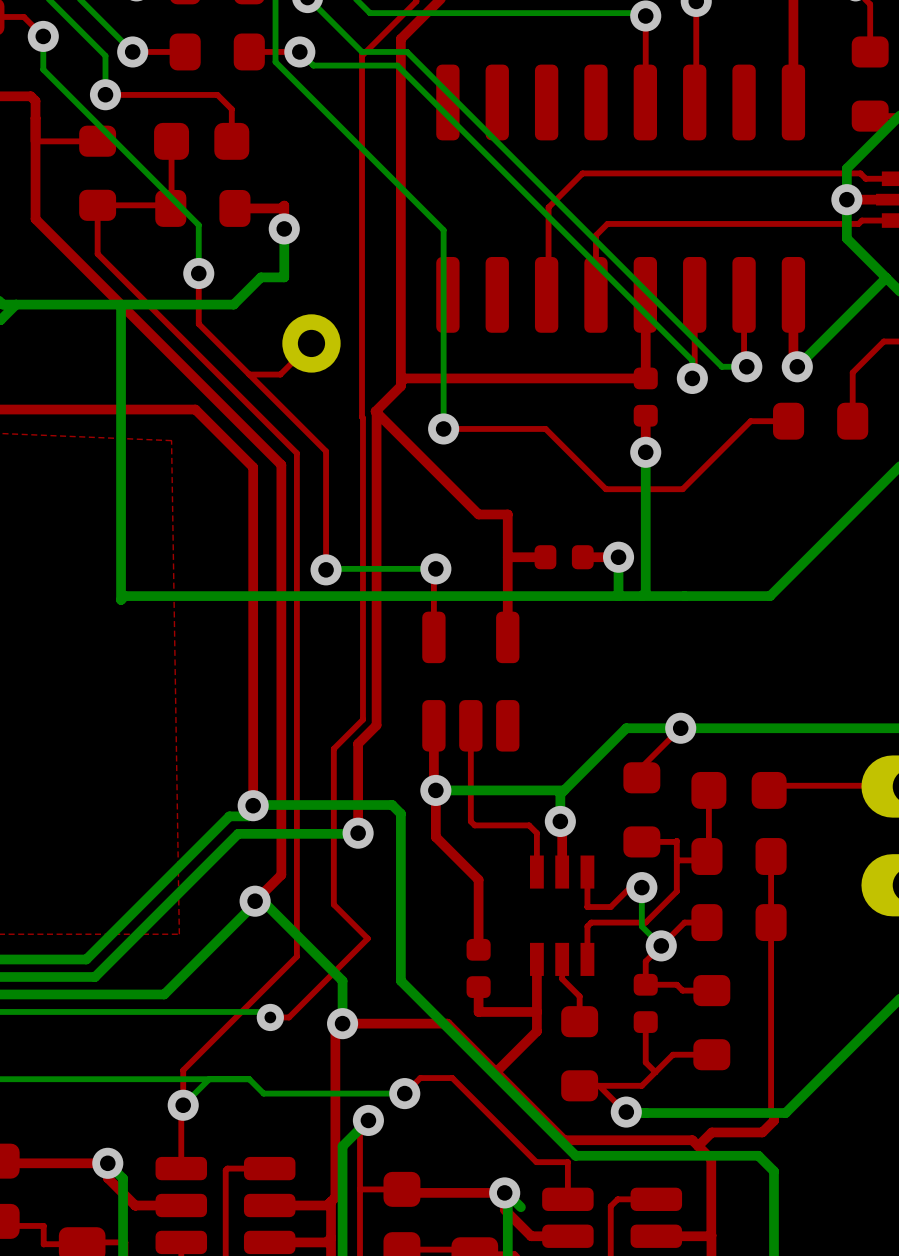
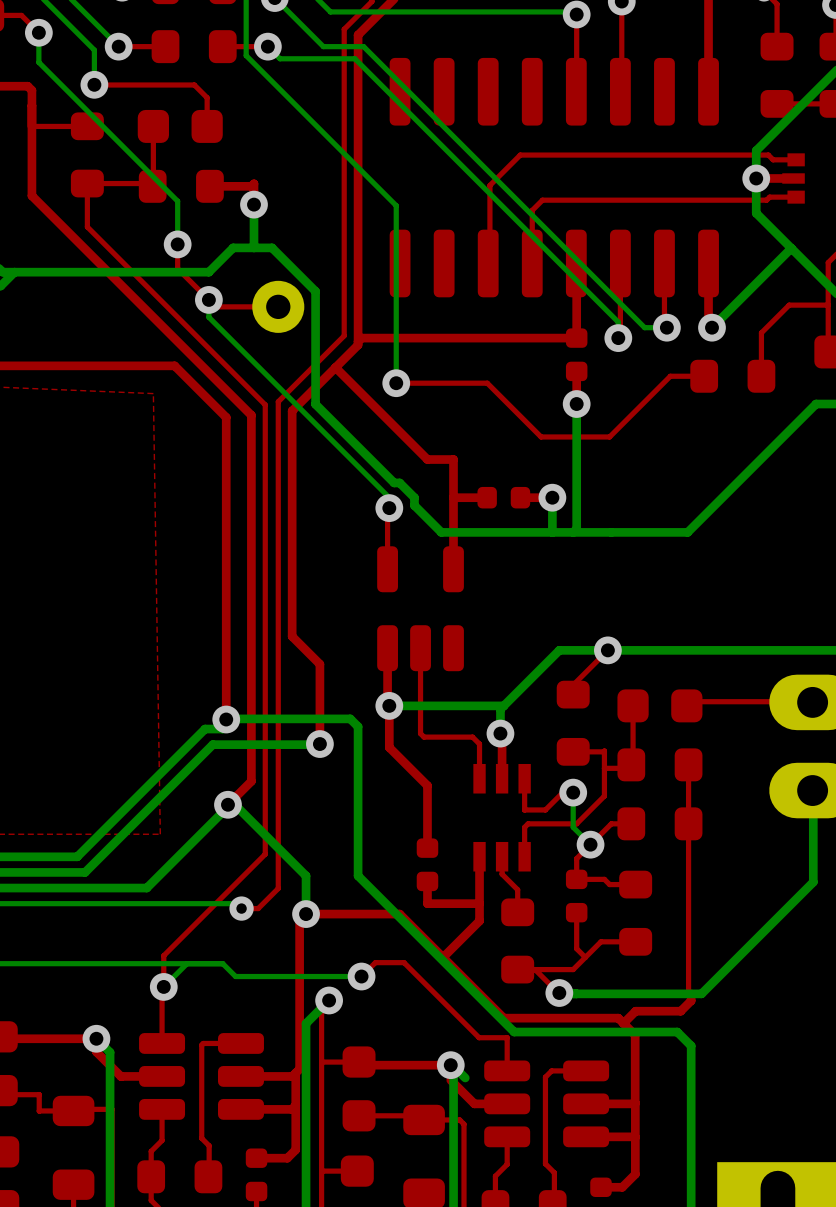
top track: (385, 32) (362, 55) (362, 719) (333, 748) (333, 904) (367, 938) (311, 994) -> (344, 29) (344, 335) (278, 401) (278, 888)
top track: (198, 300) (198, 324) (326, 451) (326, 569) -> none
bottom track: (121, 304) (121, 599) (124, 596) (494, 596) -> (253, 247) (272, 247) (315, 291) (315, 404) (394, 482) (399, 482) (414, 497) (414, 505) (441, 532)
via: none -> (208, 299)
top track: (311, 343) (280, 374) (249, 374) -> (278, 306) (215, 306) (177, 268)
top track: (376, 412) (376, 725) (358, 743) -> (335, 367) (292, 410) (292, 636) (319, 664)
bottom track: (435, 568) (326, 569) -> (389, 508) (389, 497) (208, 317) (208, 299)
via: (326, 569) -> none

